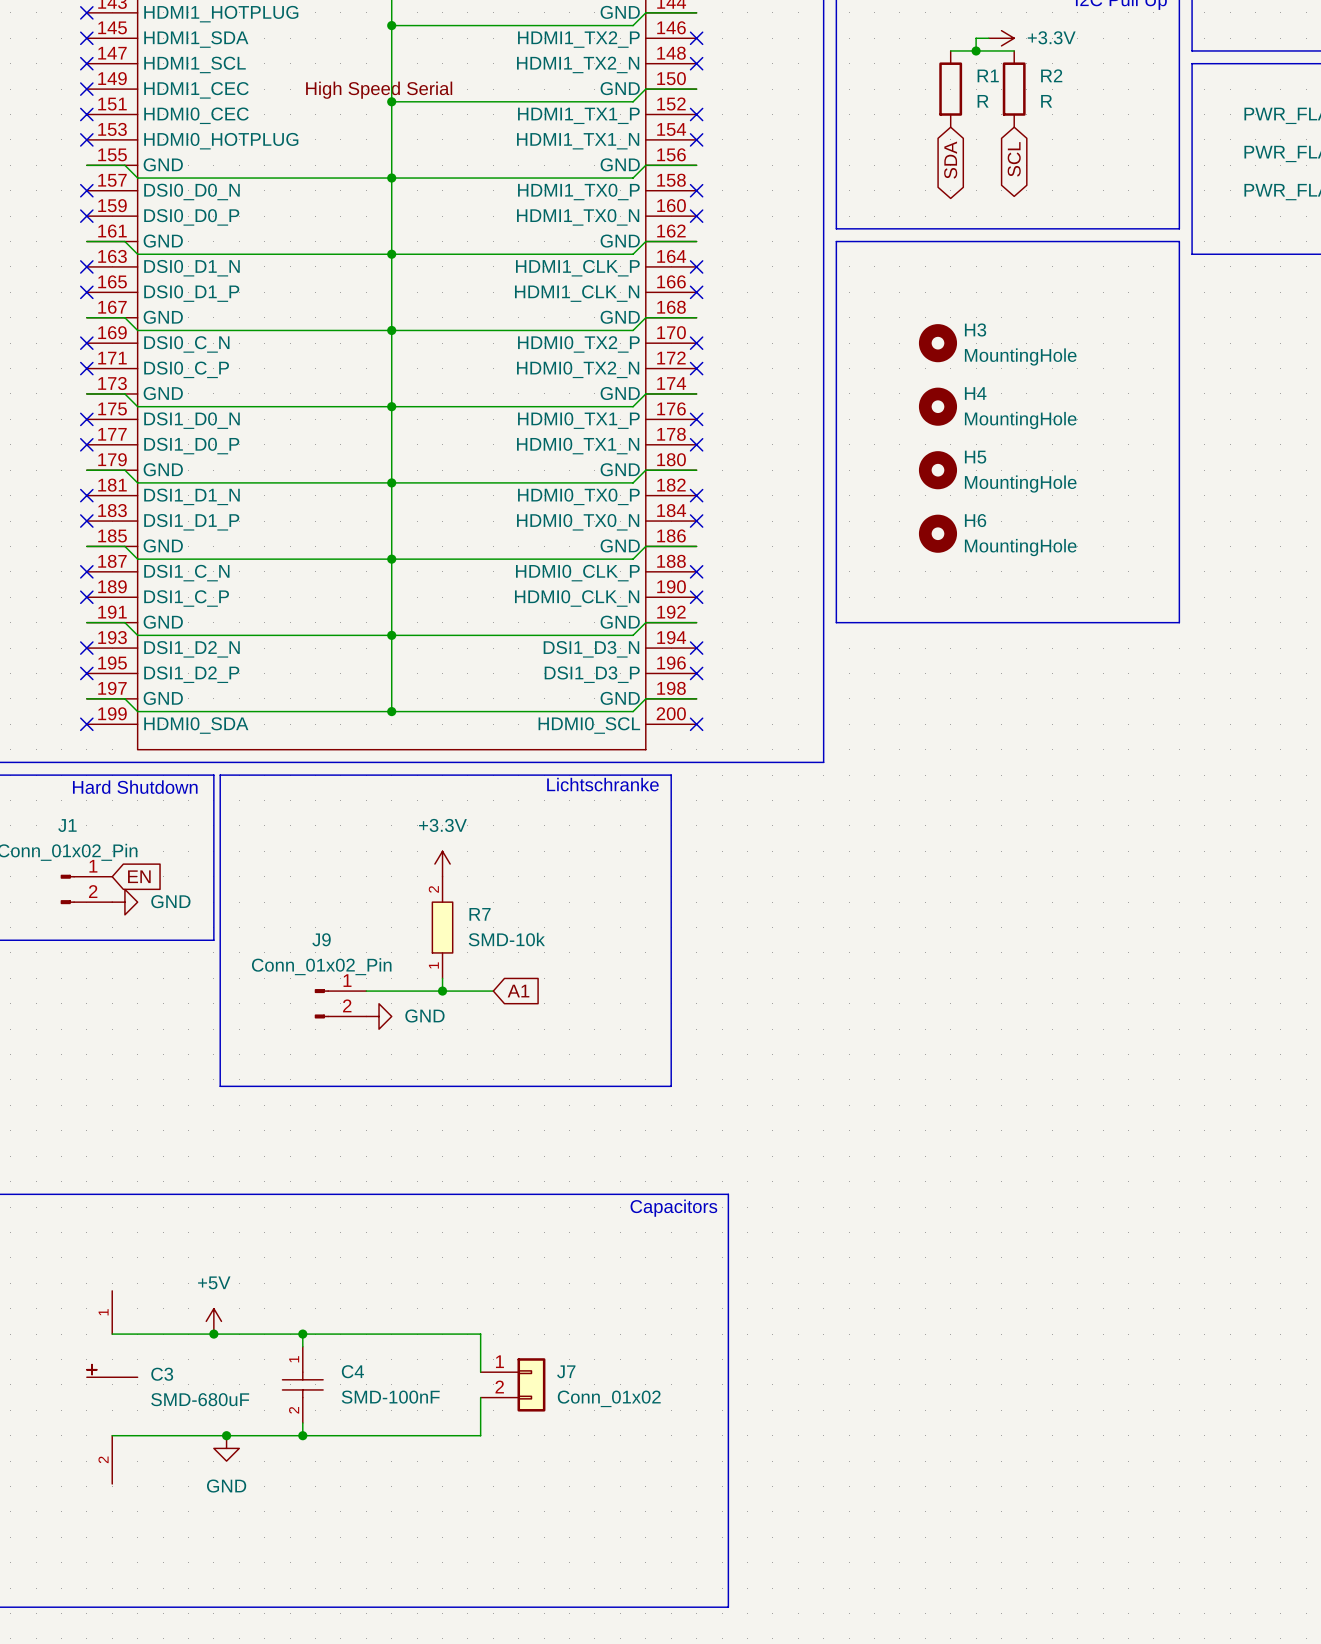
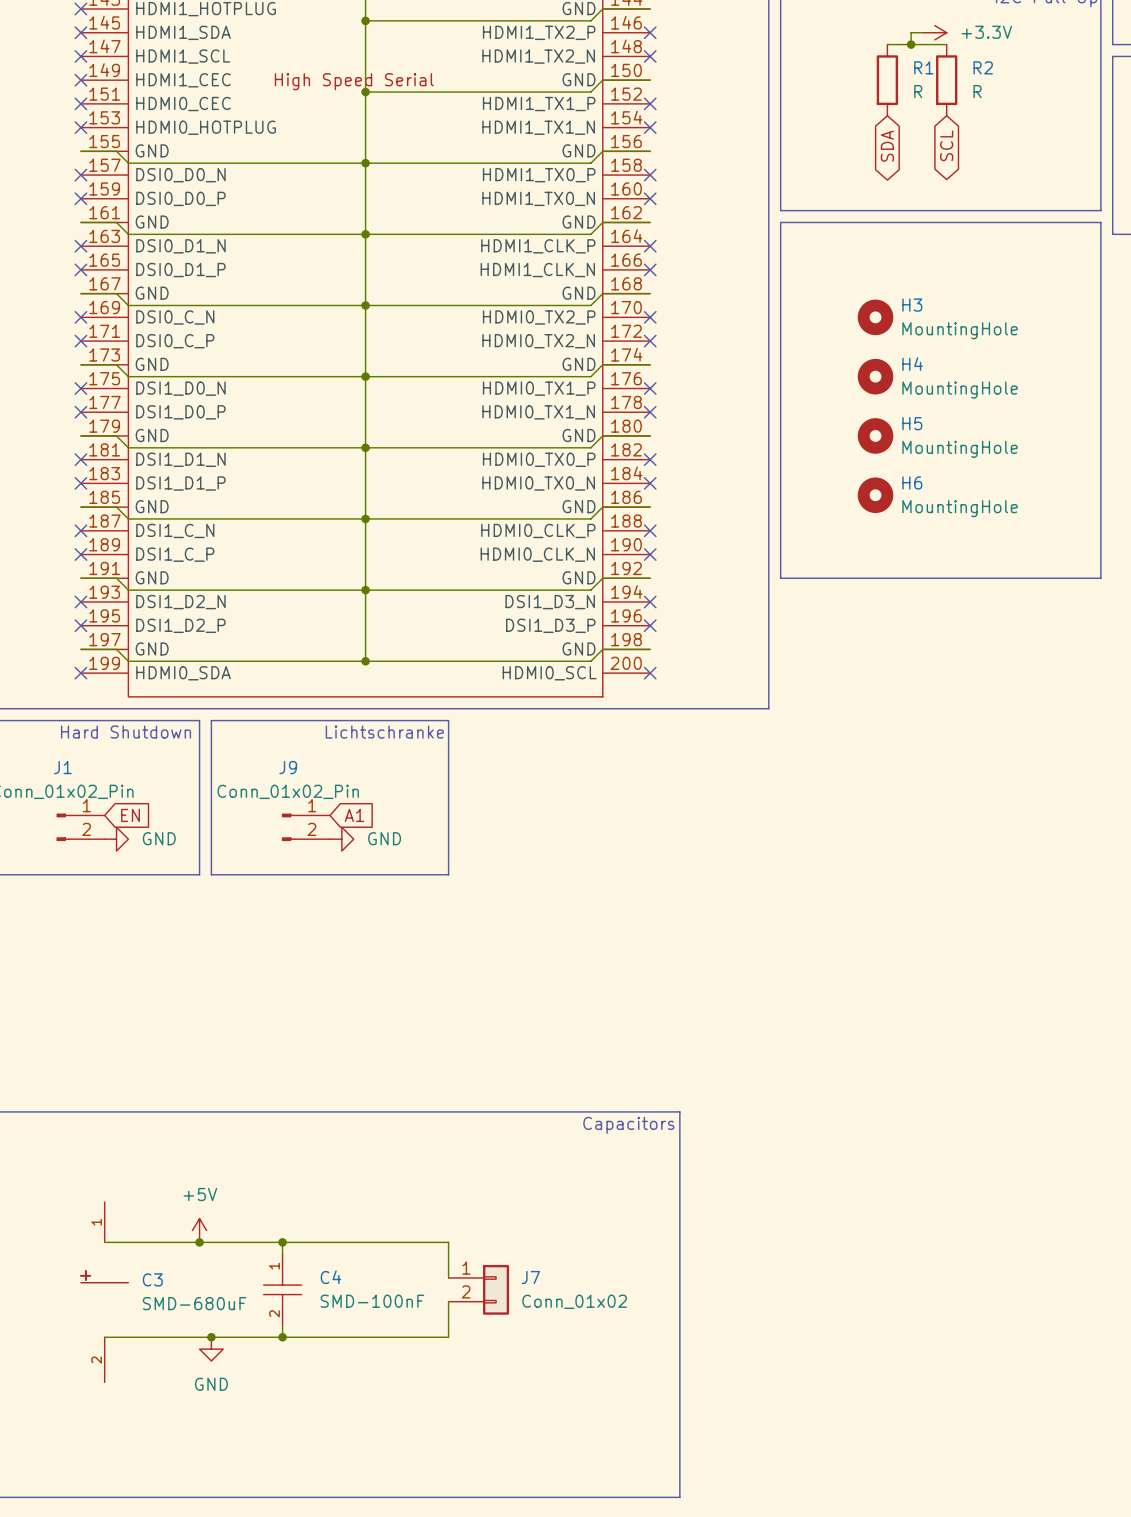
line: (226, 775) (220, 775) (220, 1086) (671, 1086) (671, 775) (480, 775) -> (211, 720) (211, 874) (448, 874) (448, 720)
text position: Lichtschranke (602, 784) -> Lichtschranke (384, 732)
power symbol: +3.3V (442, 864) -> none
R7: SMD-10k (442, 927) -> none
wire: (442, 978) (442, 991) -> none
wire: (366, 991) (493, 991) -> none
junction: (442, 991) -> none
global label position: A1 (518, 991) -> A1 (354, 815)
J9 position: (340, 1003) -> (305, 827)
power symbol position: GND (379, 1016) -> GND (341, 839)

